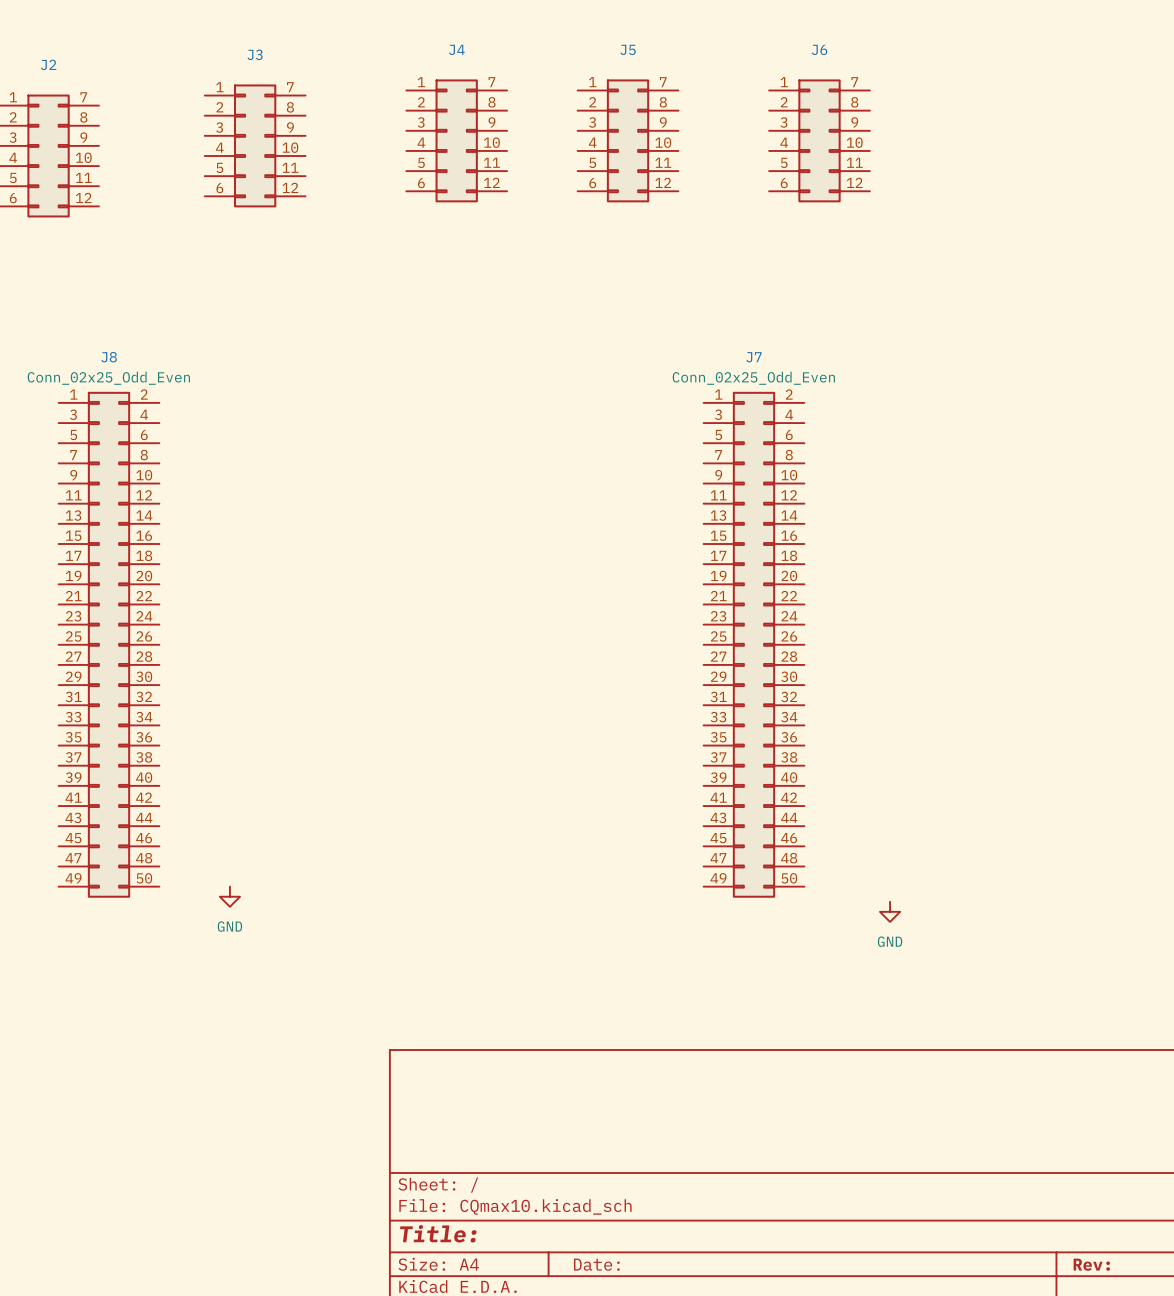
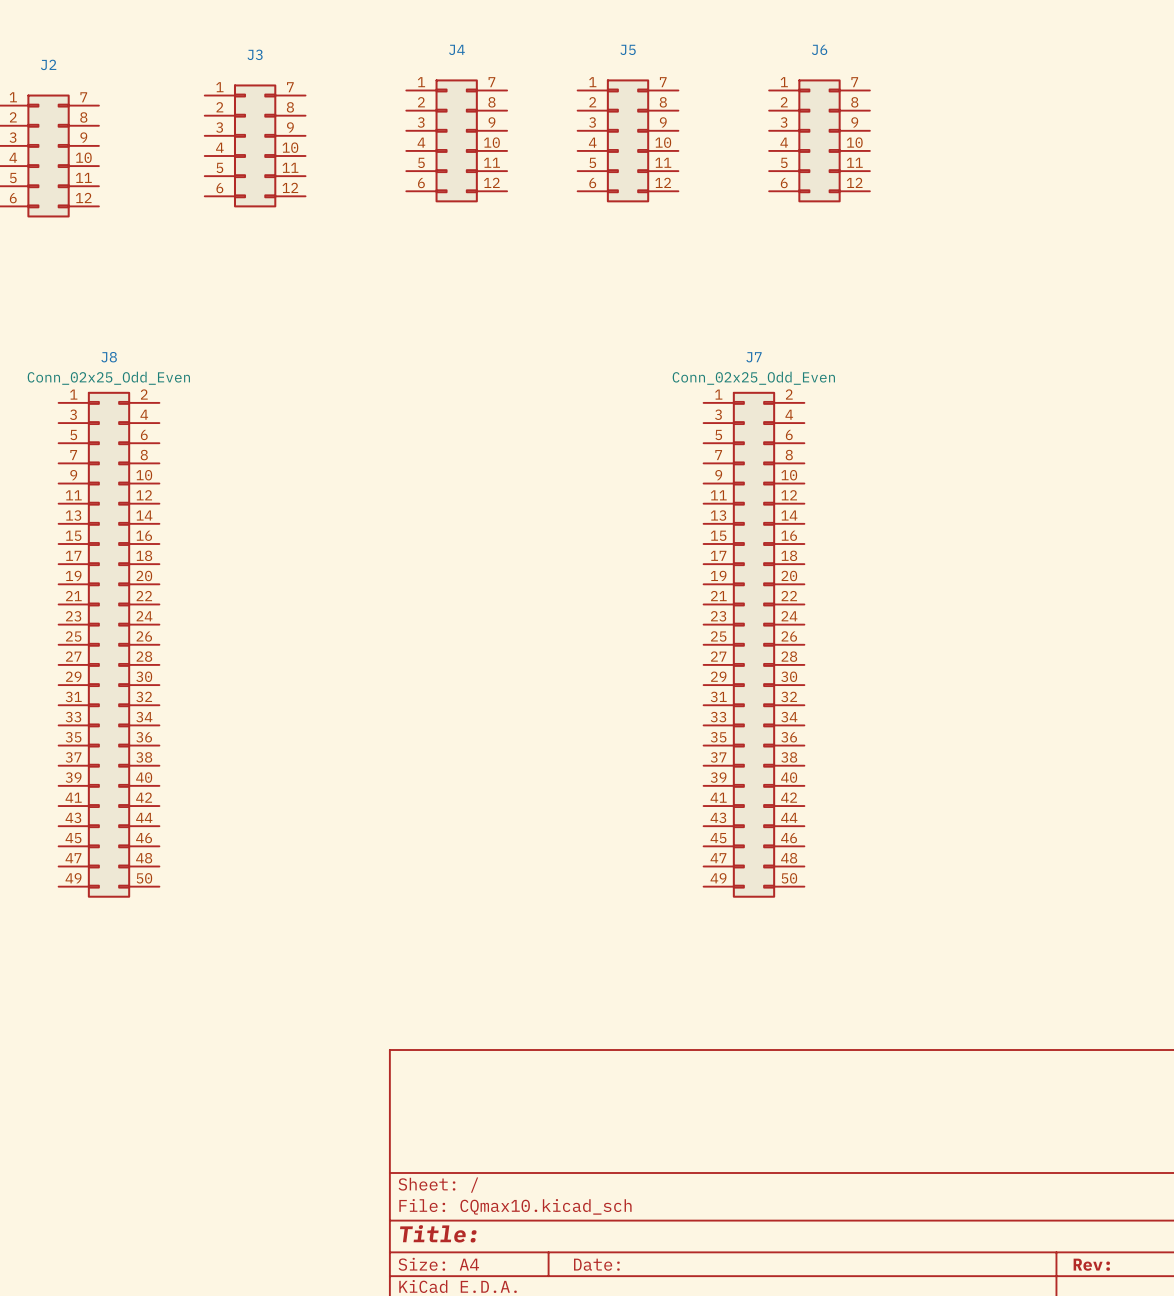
power symbol: GND (229, 896) -> none
power symbol: GND (890, 911) -> none

